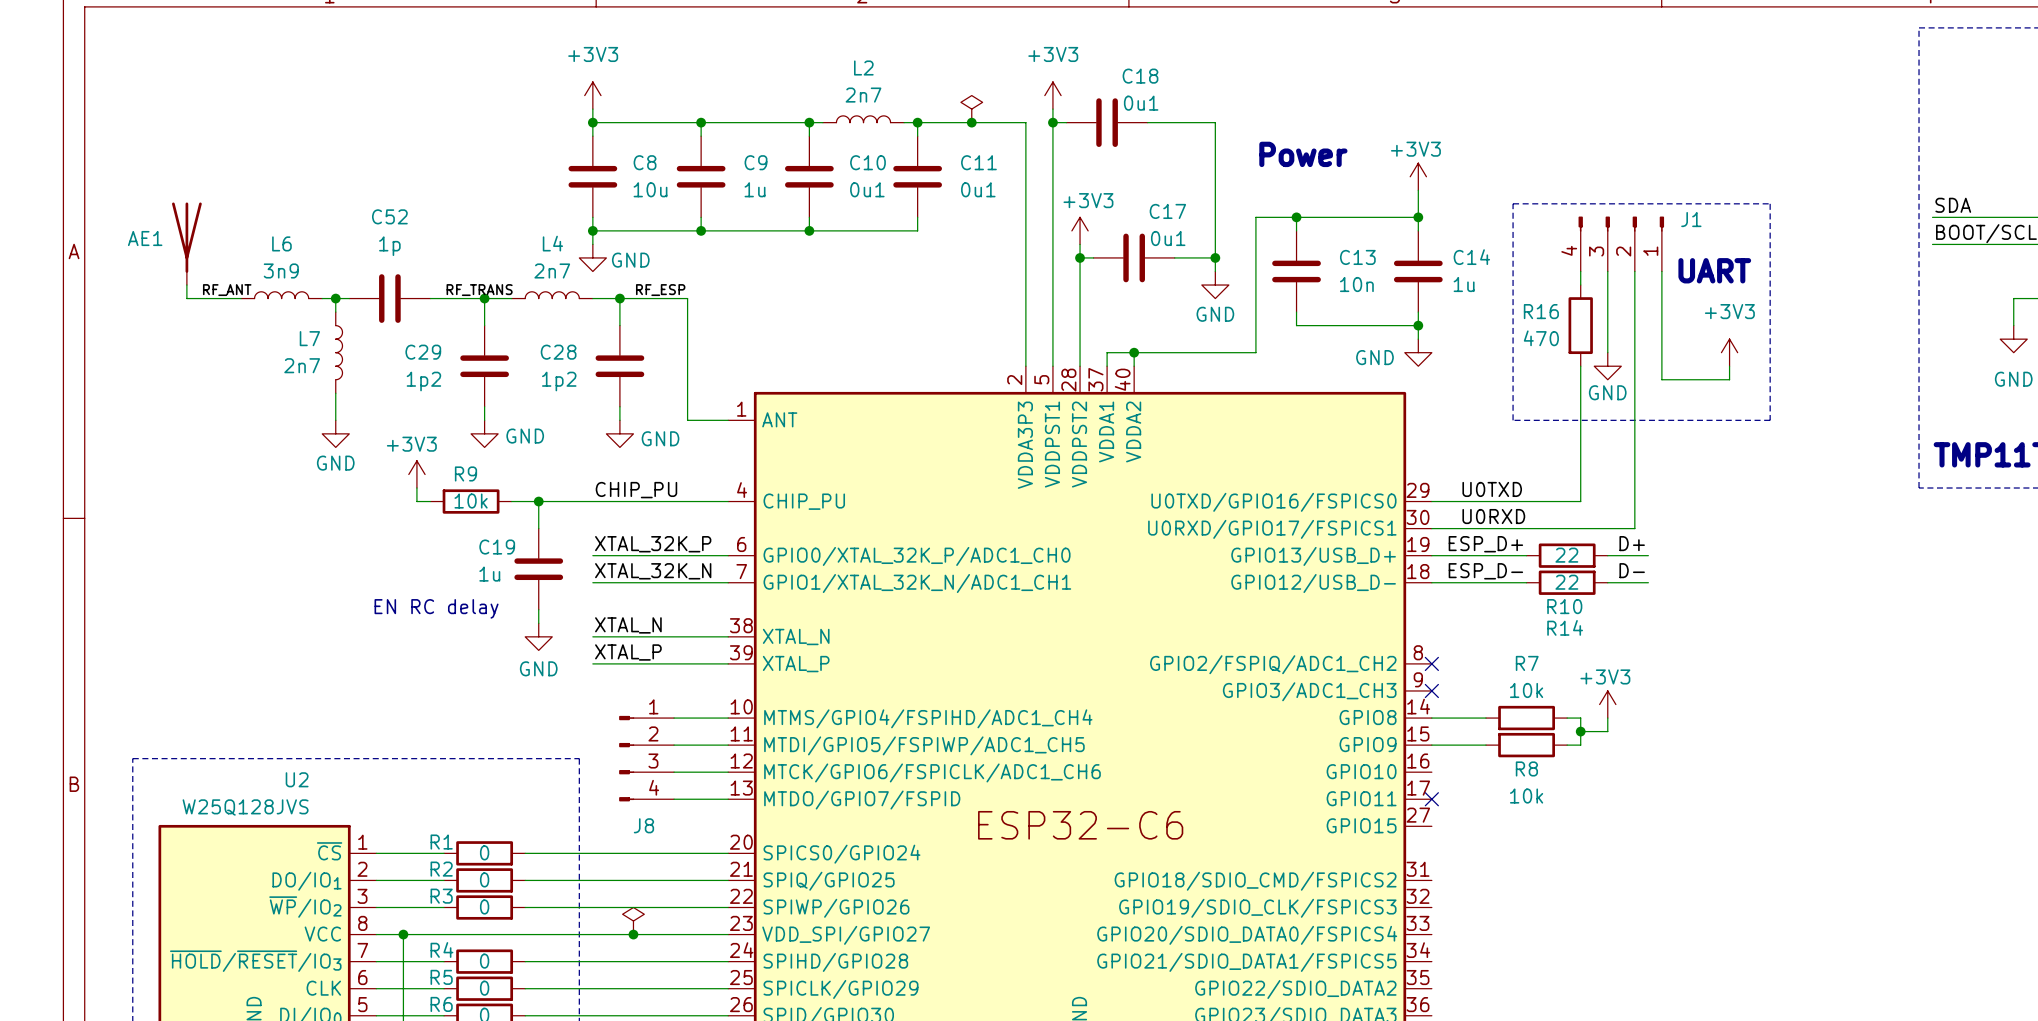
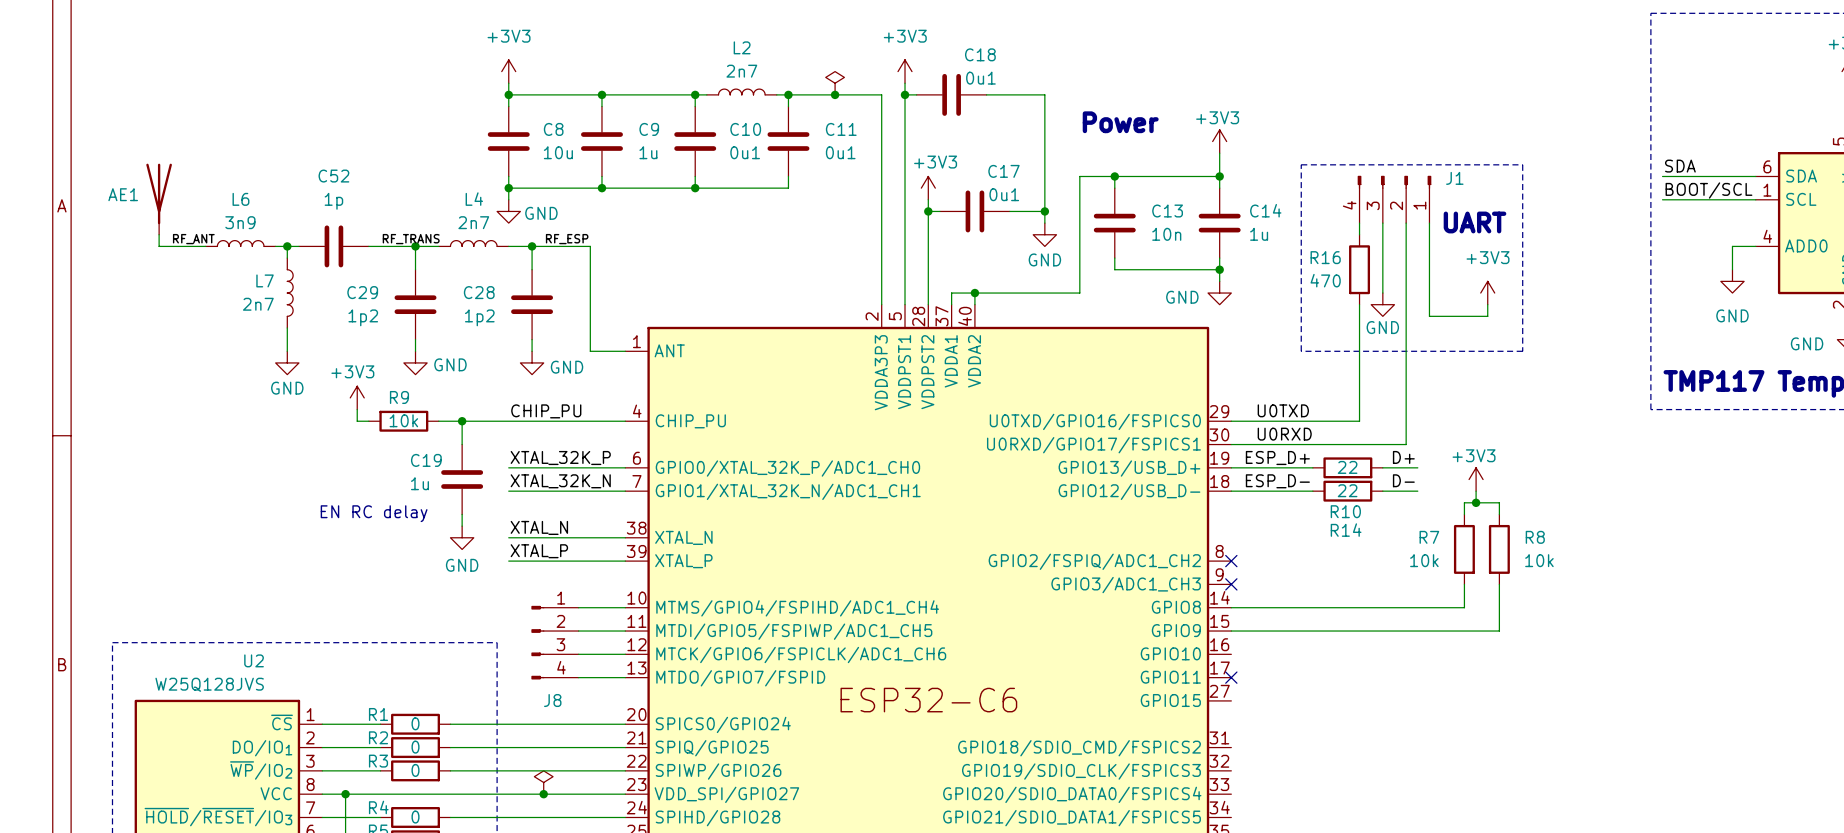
wire: none -> (1476, 491) (1476, 502)
junction: none -> (1476, 502)
wire: none -> (1464, 514) (1464, 502) (1499, 502) (1499, 514)
R7 name position: R7 (1527, 663) -> R7 (1429, 537)
R7 value position: 10k (1526, 690) -> 10k (1424, 560)
wire: none -> (1499, 584) (1499, 631) (1359, 631)
power symbol position: +3V3 (1607, 704) -> +3V3 (1476, 479)
wire: none -> (1277, 607) (1347, 607)
R7 rotation: 0° (1526, 718) -> 90° clockwise (1464, 549)
R7 position: (1526, 718) -> (1464, 549)
wire: (1580, 718) (1580, 745) -> (1359, 607) (1464, 607) (1464, 584)
wire: (1607, 718) (1607, 731) (1580, 731) -> none
junction: (1580, 731) -> none
wire: none -> (1277, 631) (1347, 631)
R8 rotation: 0° (1526, 745) -> 90° clockwise (1499, 549)
R8 position: (1526, 745) -> (1499, 549)
R8 name position: R8 (1526, 768) -> R8 (1535, 537)
R8 value position: 10k (1526, 796) -> 10k (1539, 560)

